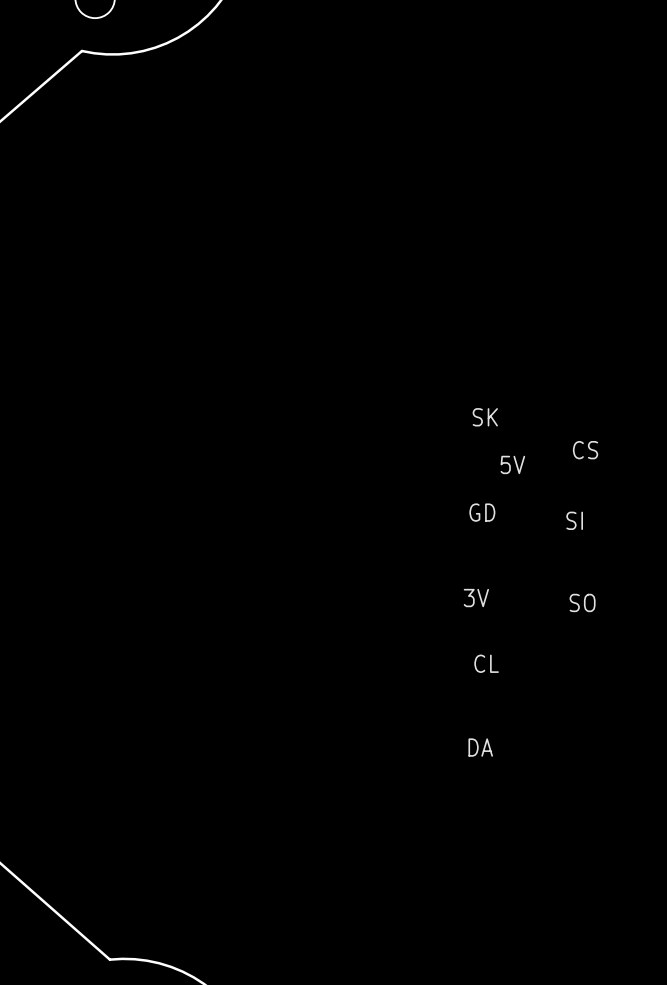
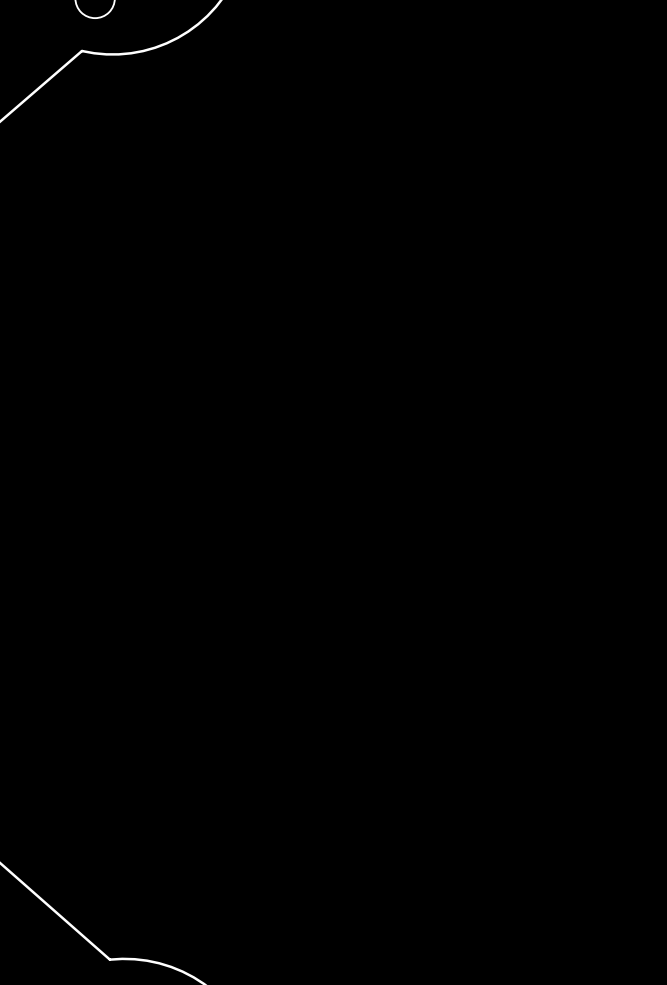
text: SK (485, 417) -> none
text: CS (585, 450) -> none
text: 5V (512, 464) -> none
text: GD (482, 512) -> none
text: SI (574, 520) -> none
text: 3V (476, 598) -> none
text: SO (582, 602) -> none
text: CL (486, 663) -> none
text: DA (480, 747) -> none

